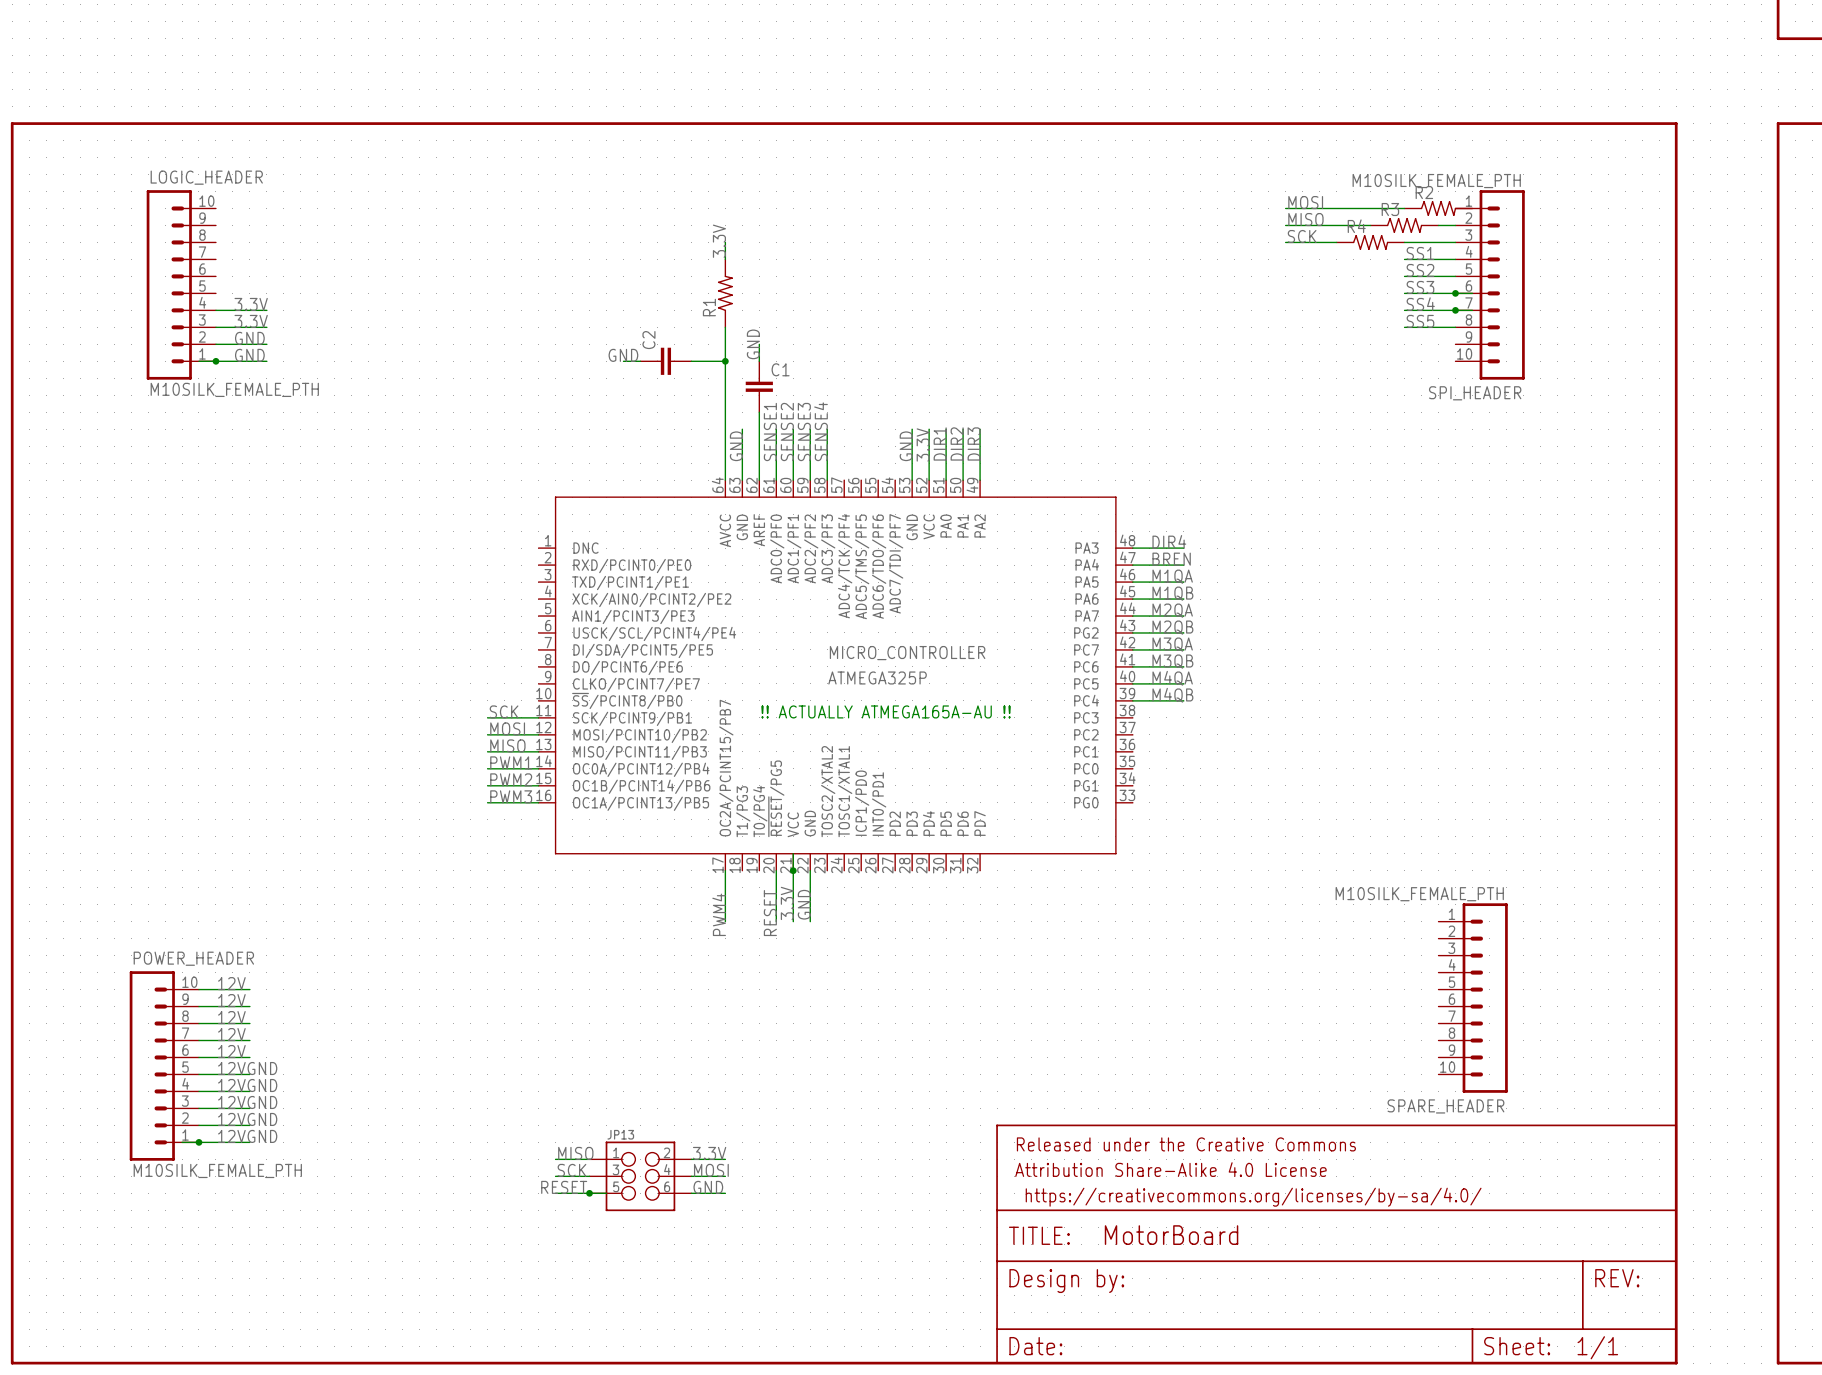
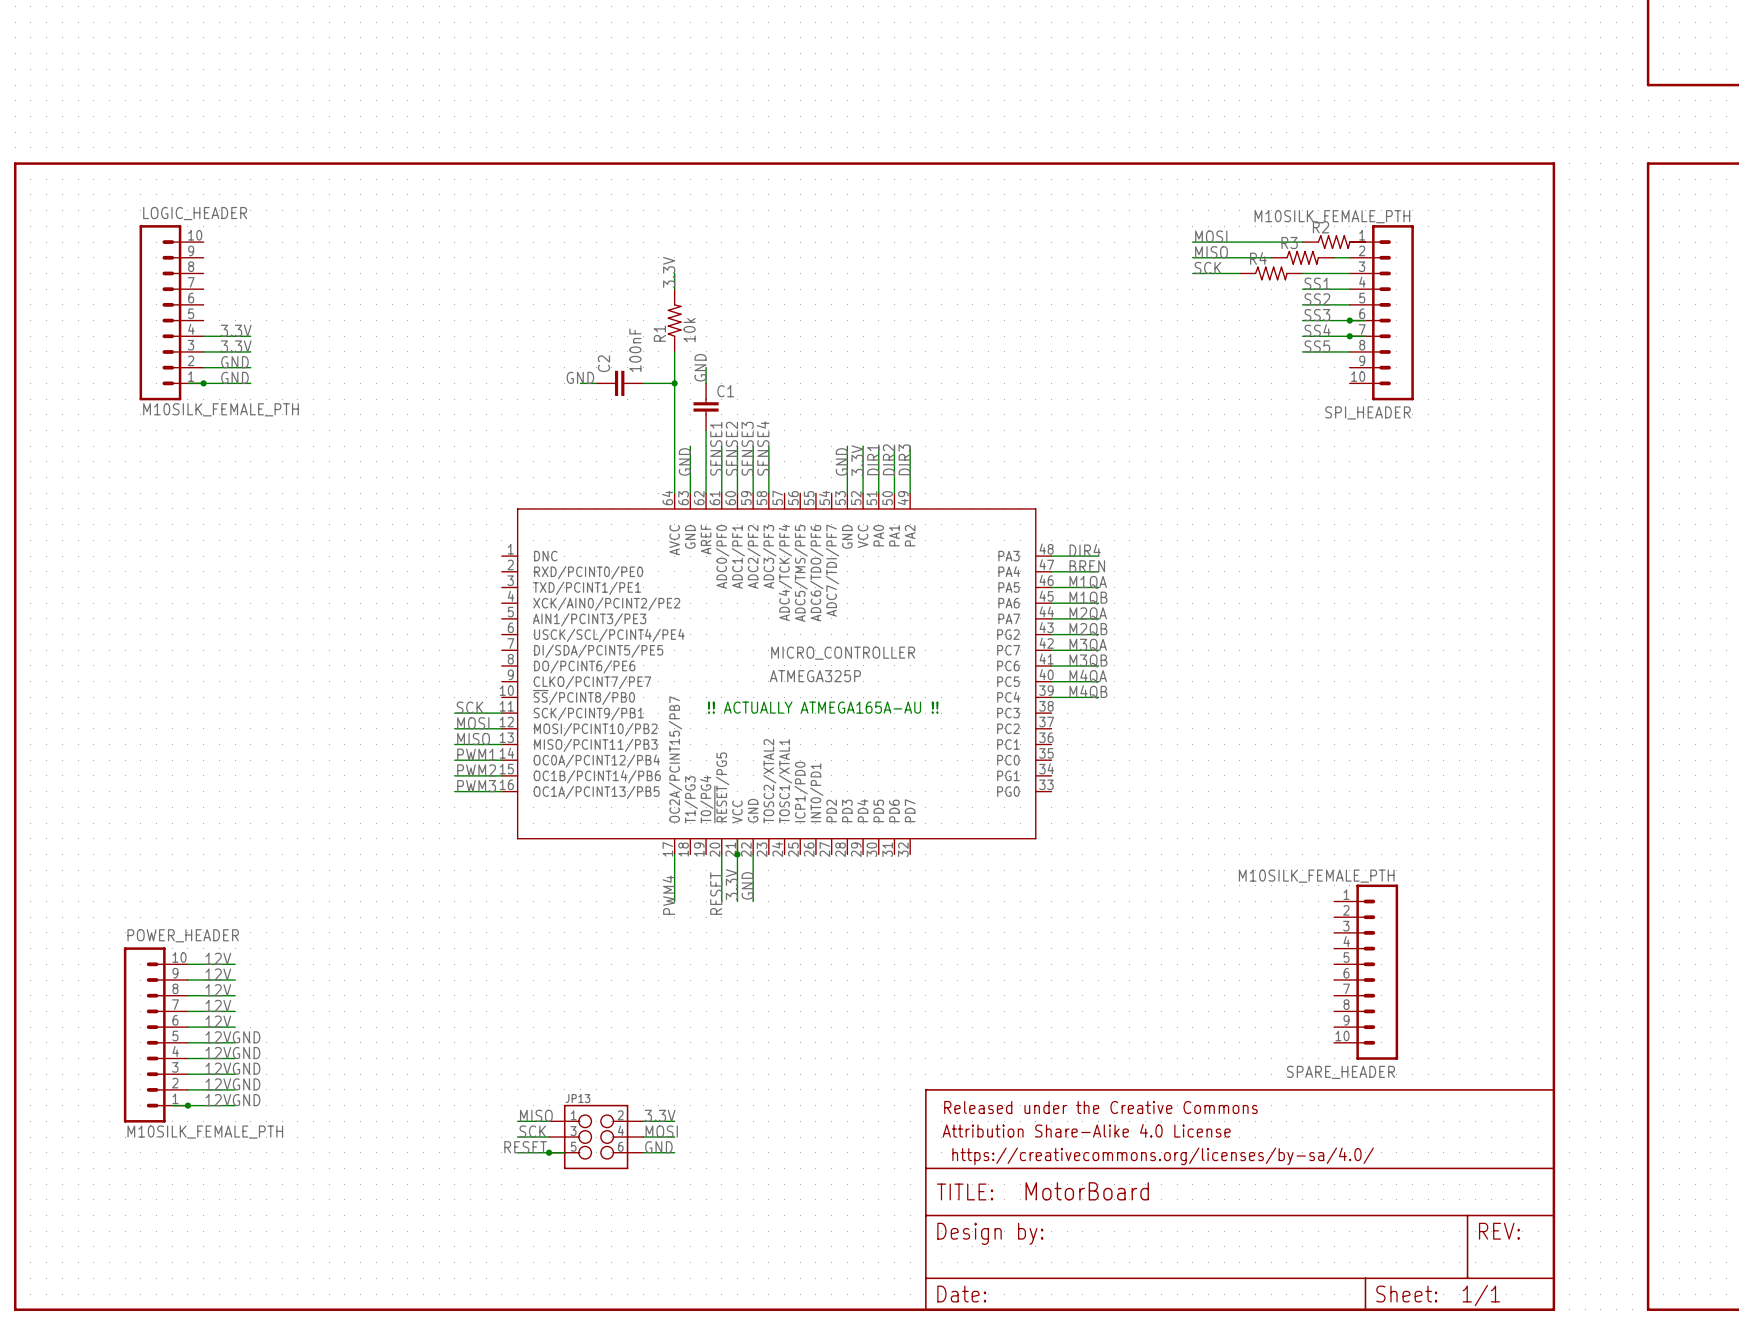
R1 value: none -> 10k (689, 330)
C2 value: none -> 100nF (635, 350)

